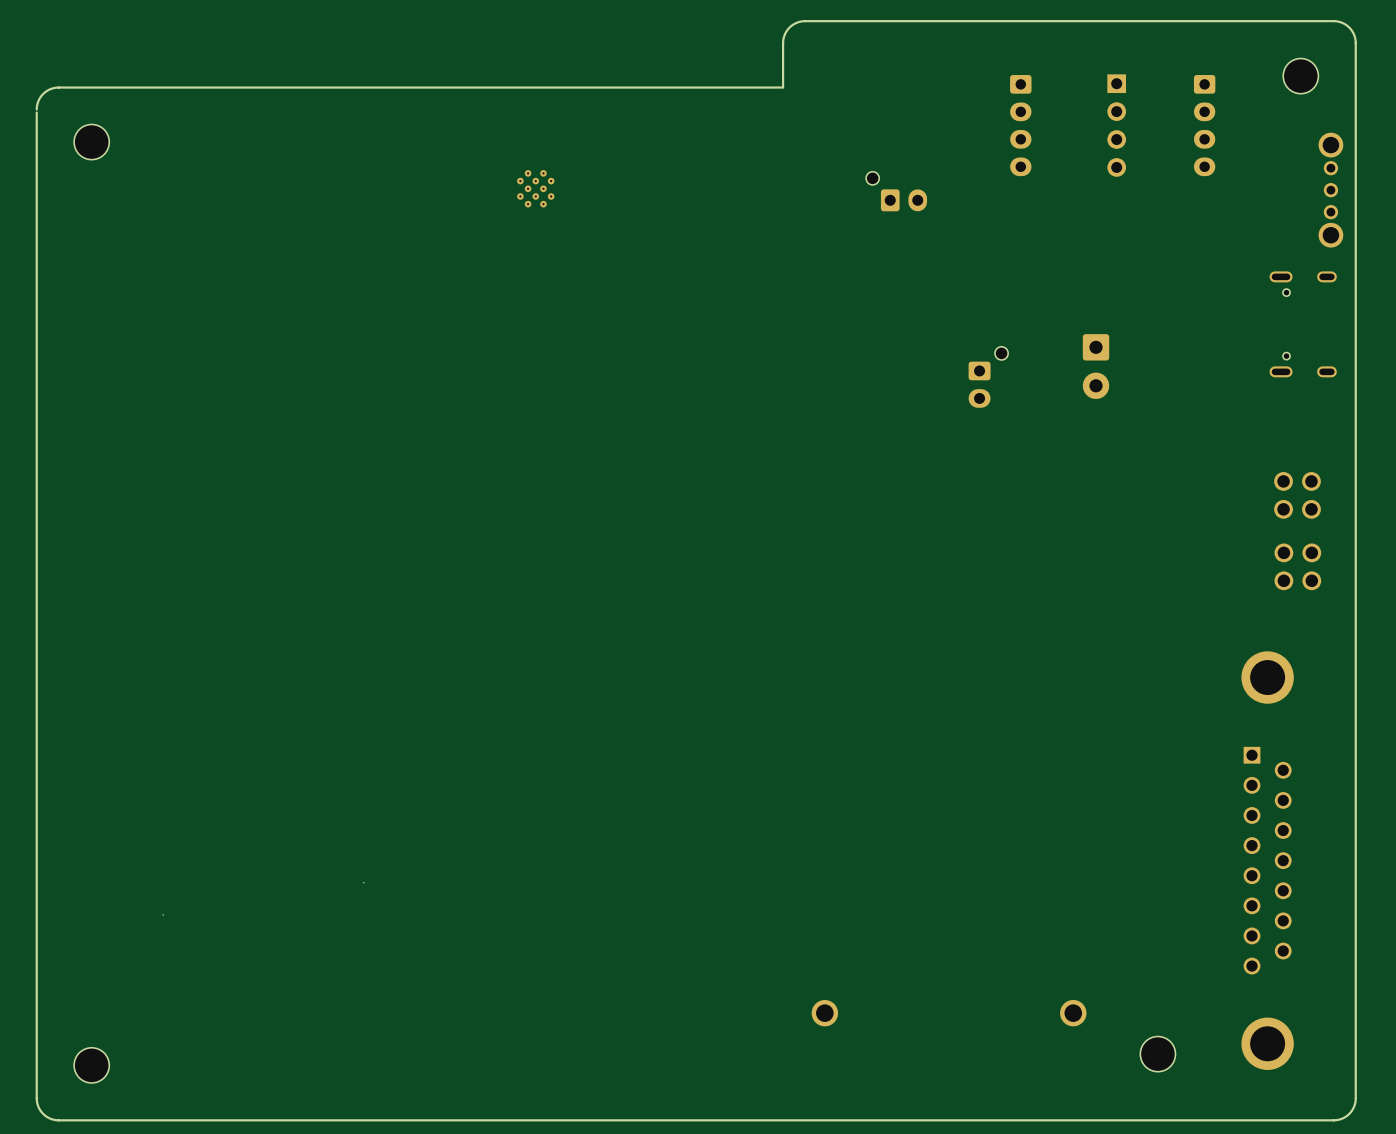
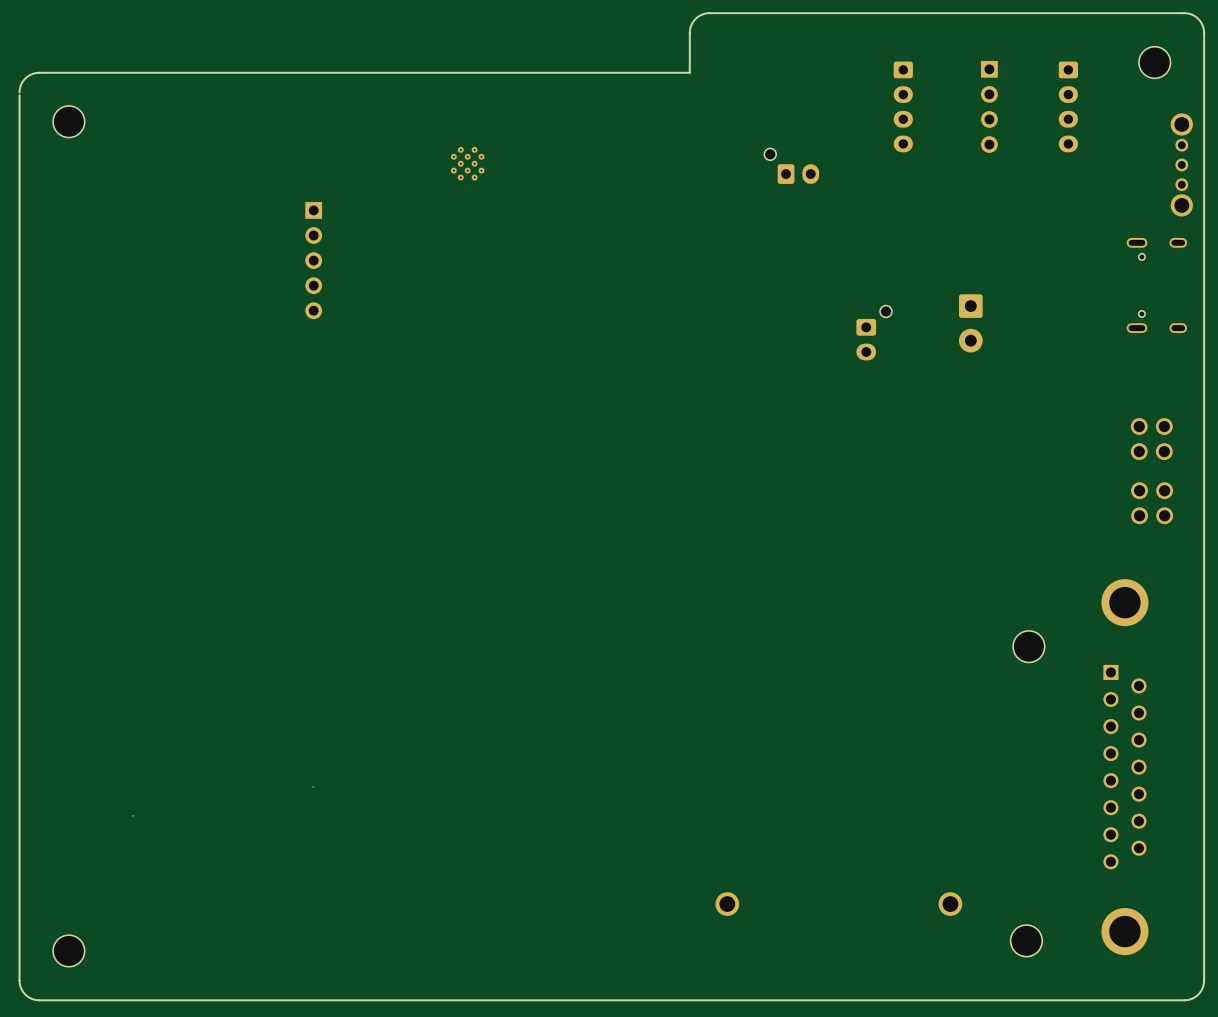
part: none -> (313, 260)
part: none -> (1028, 646)

